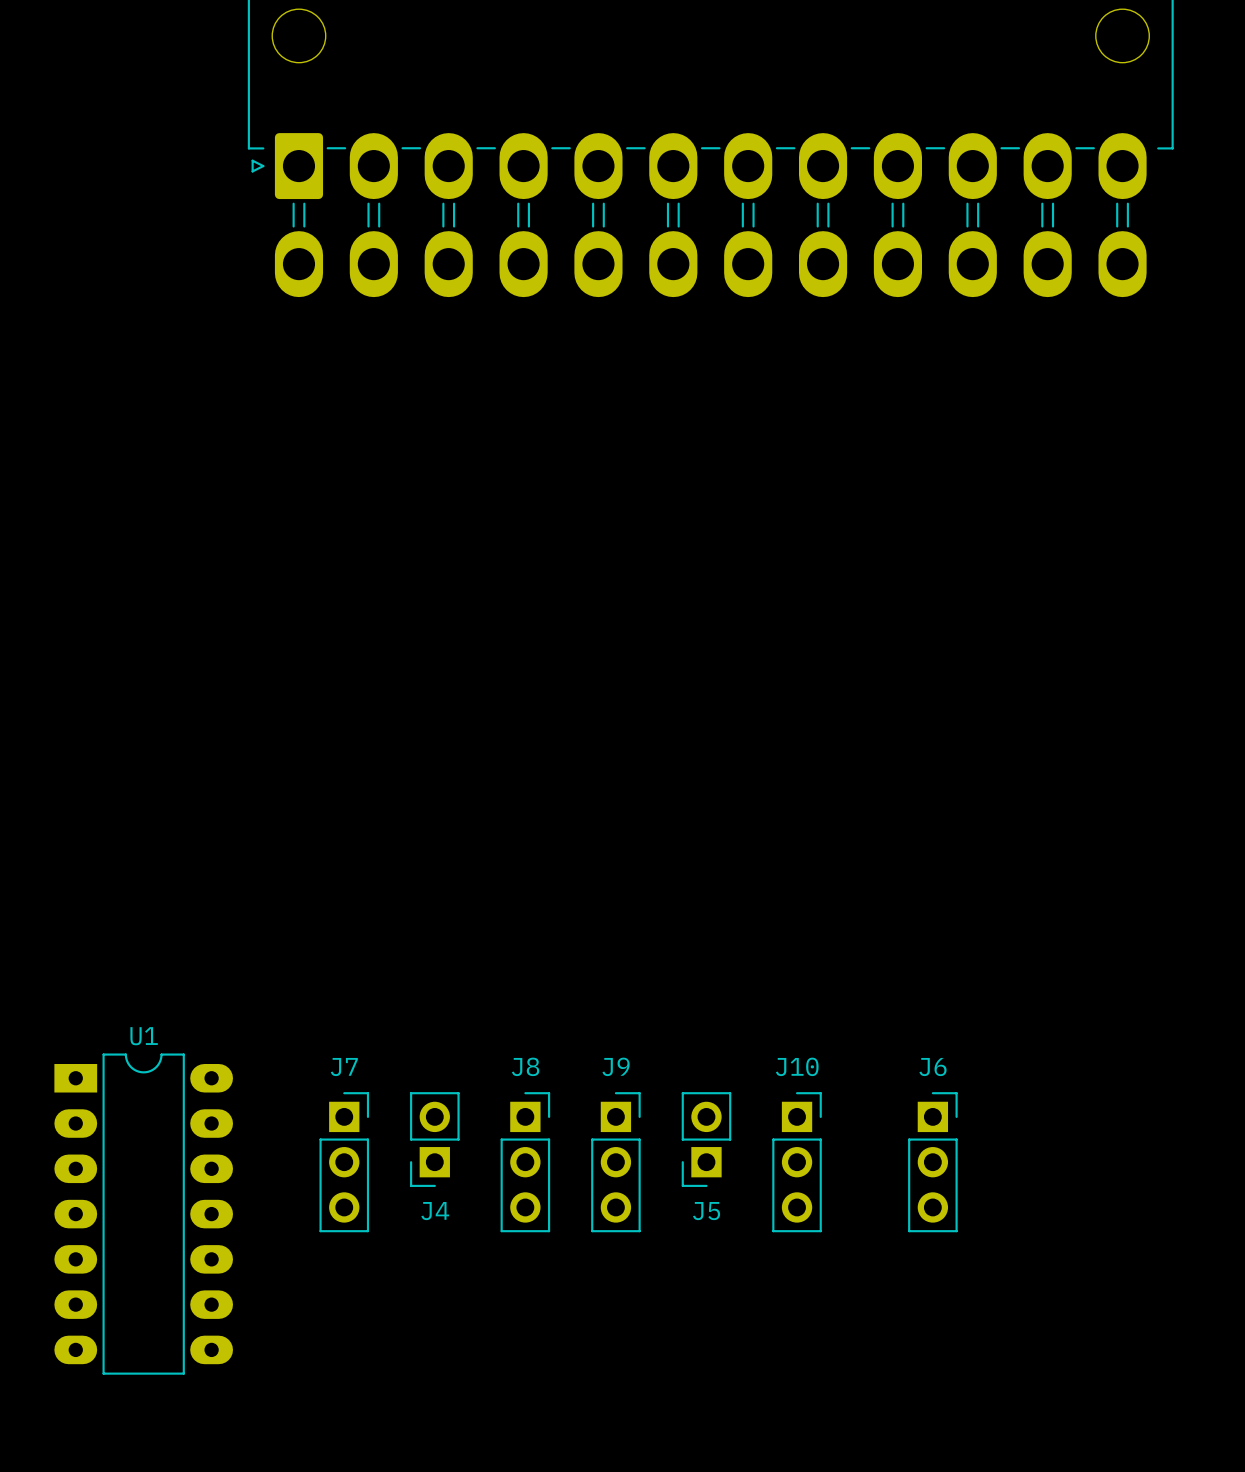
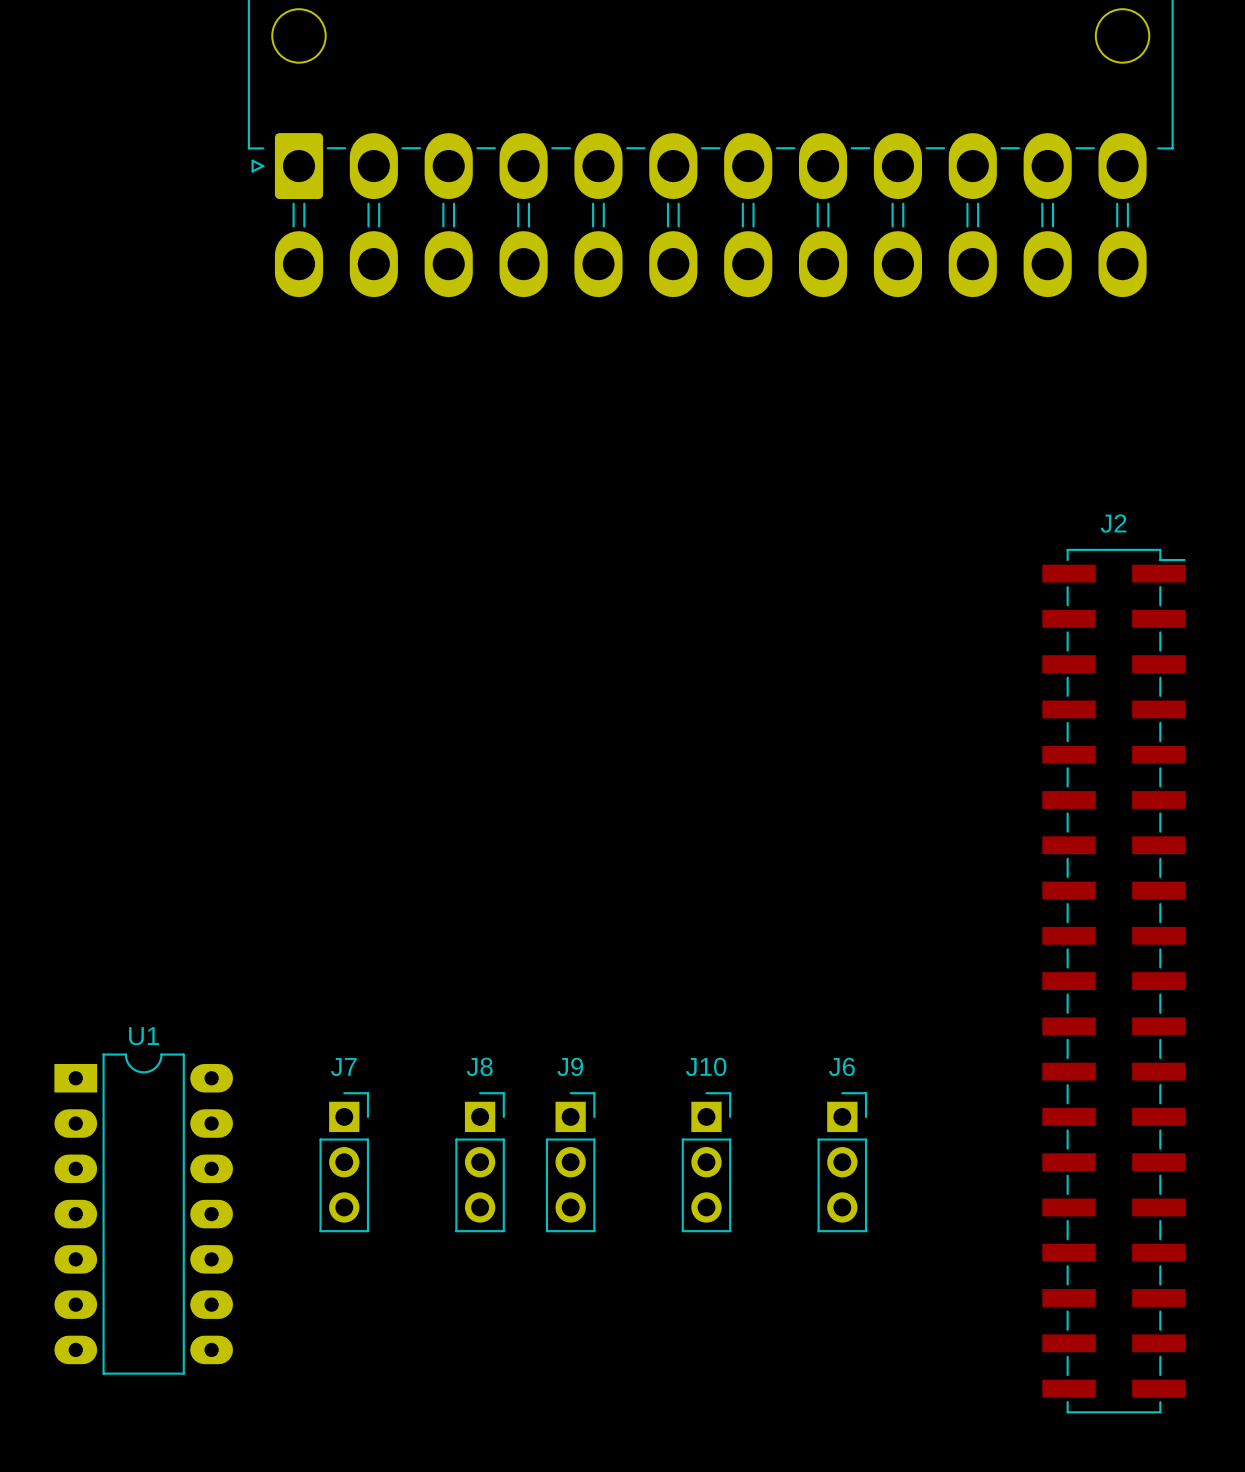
J2: none -> (1113, 981)
J4: (434, 1139) -> none
J5: (706, 1139) -> none
J8 position: (525, 1162) -> (480, 1162)
J9 position: (615, 1162) -> (570, 1162)
J10 position: (797, 1162) -> (706, 1162)
J6 position: (932, 1162) -> (842, 1162)

